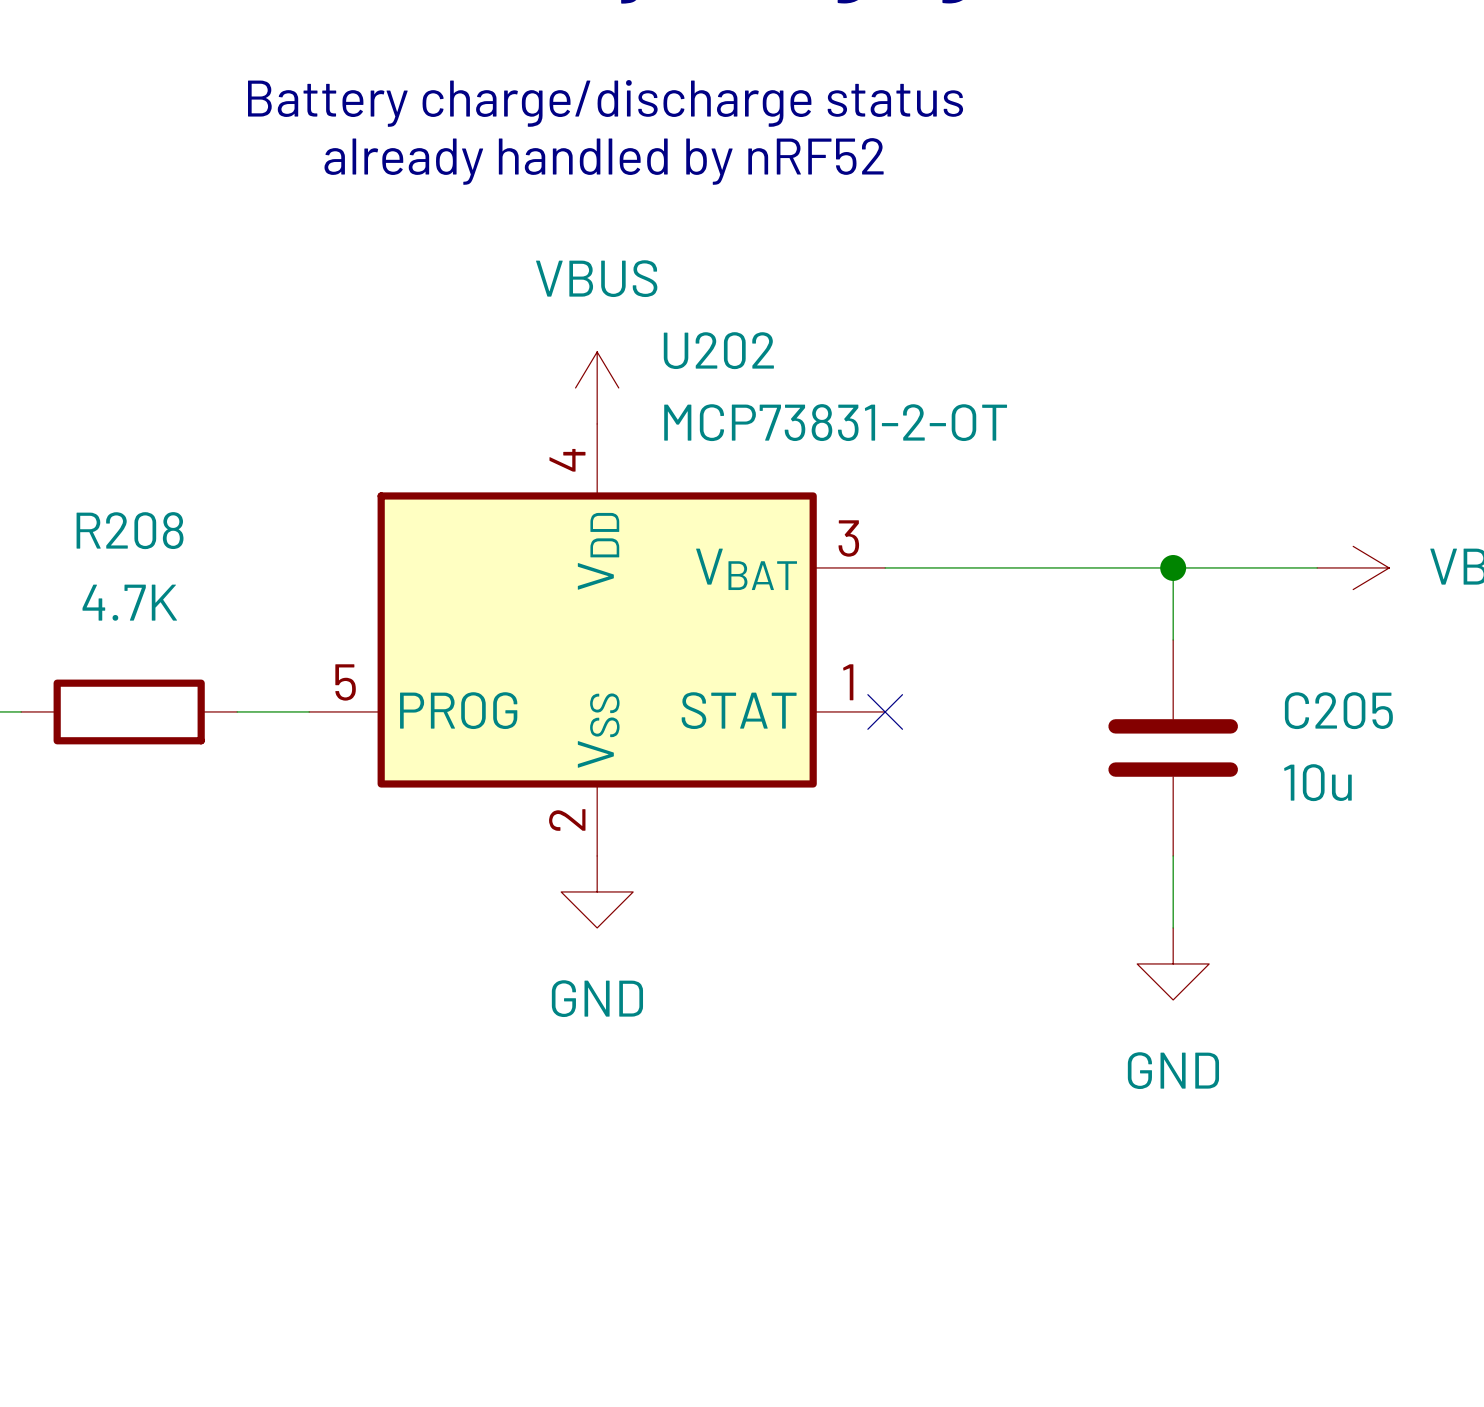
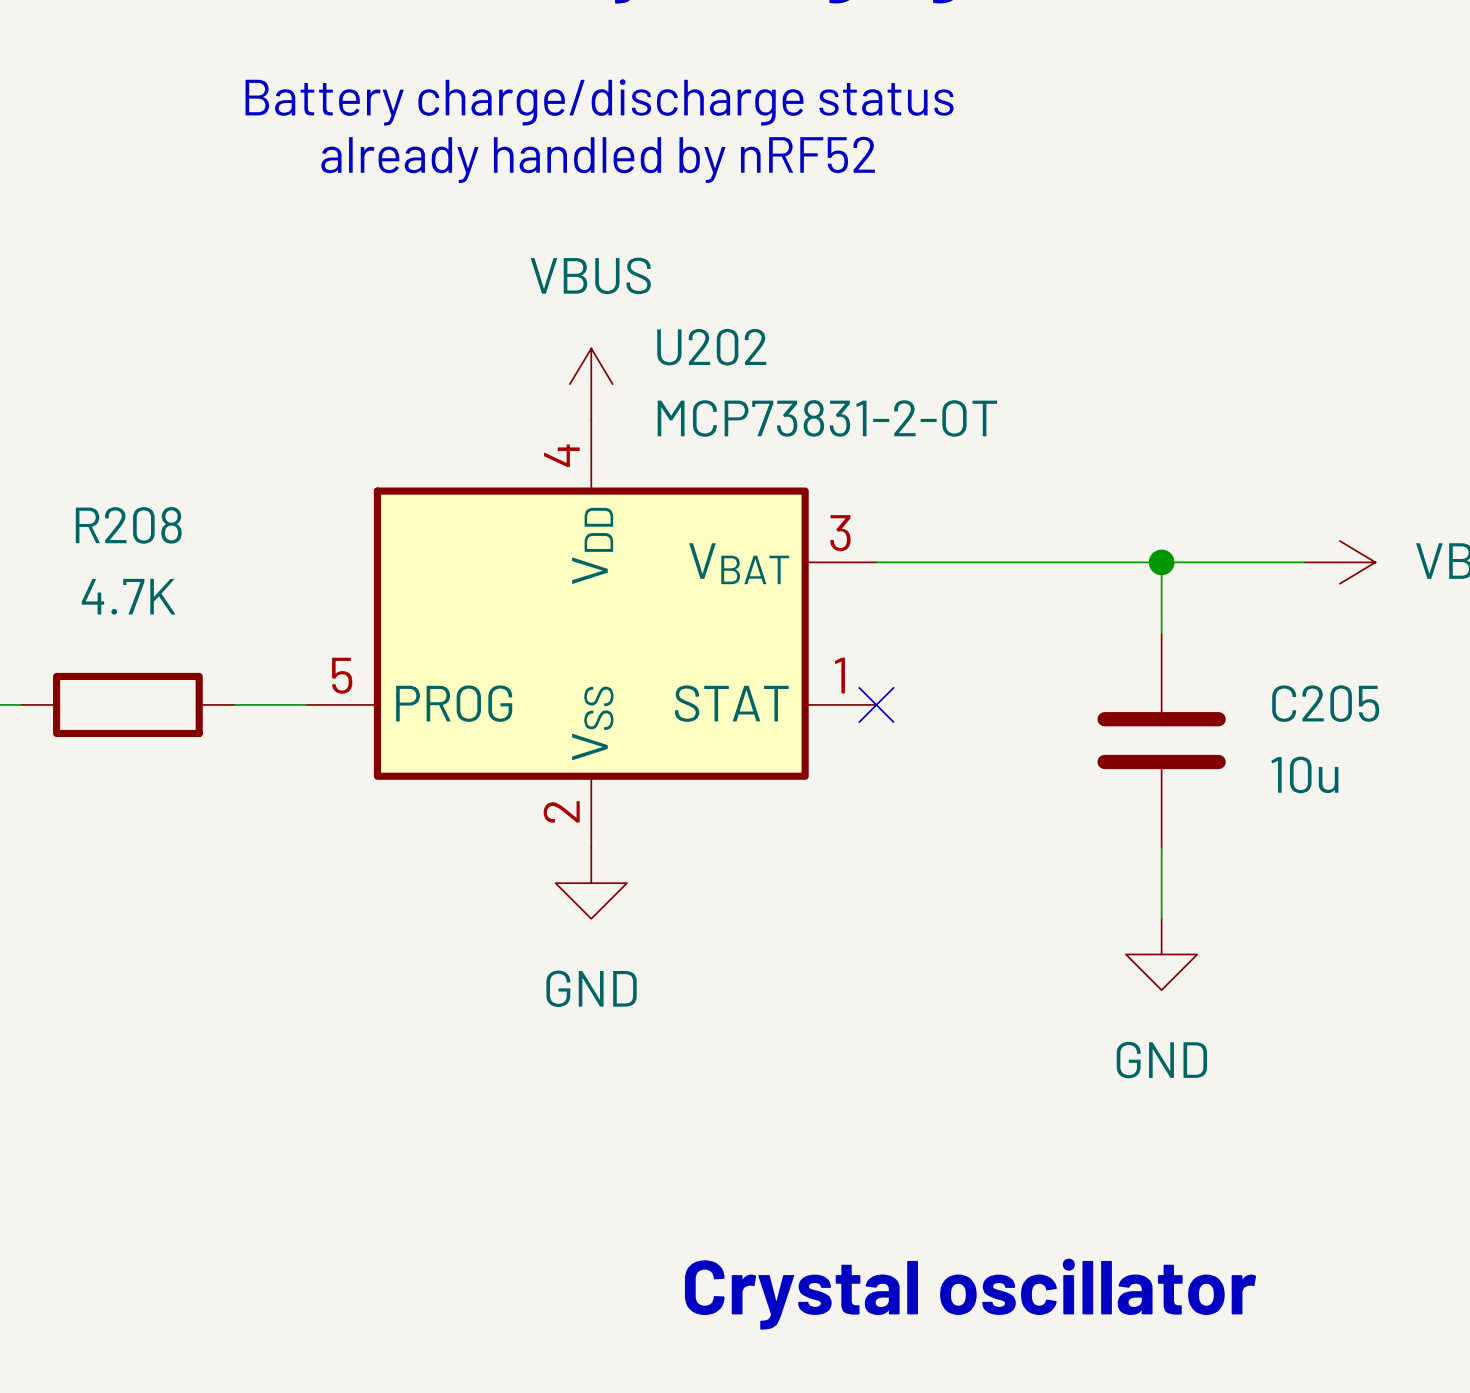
text: none -> Crystal oscillator (970, 1294)

